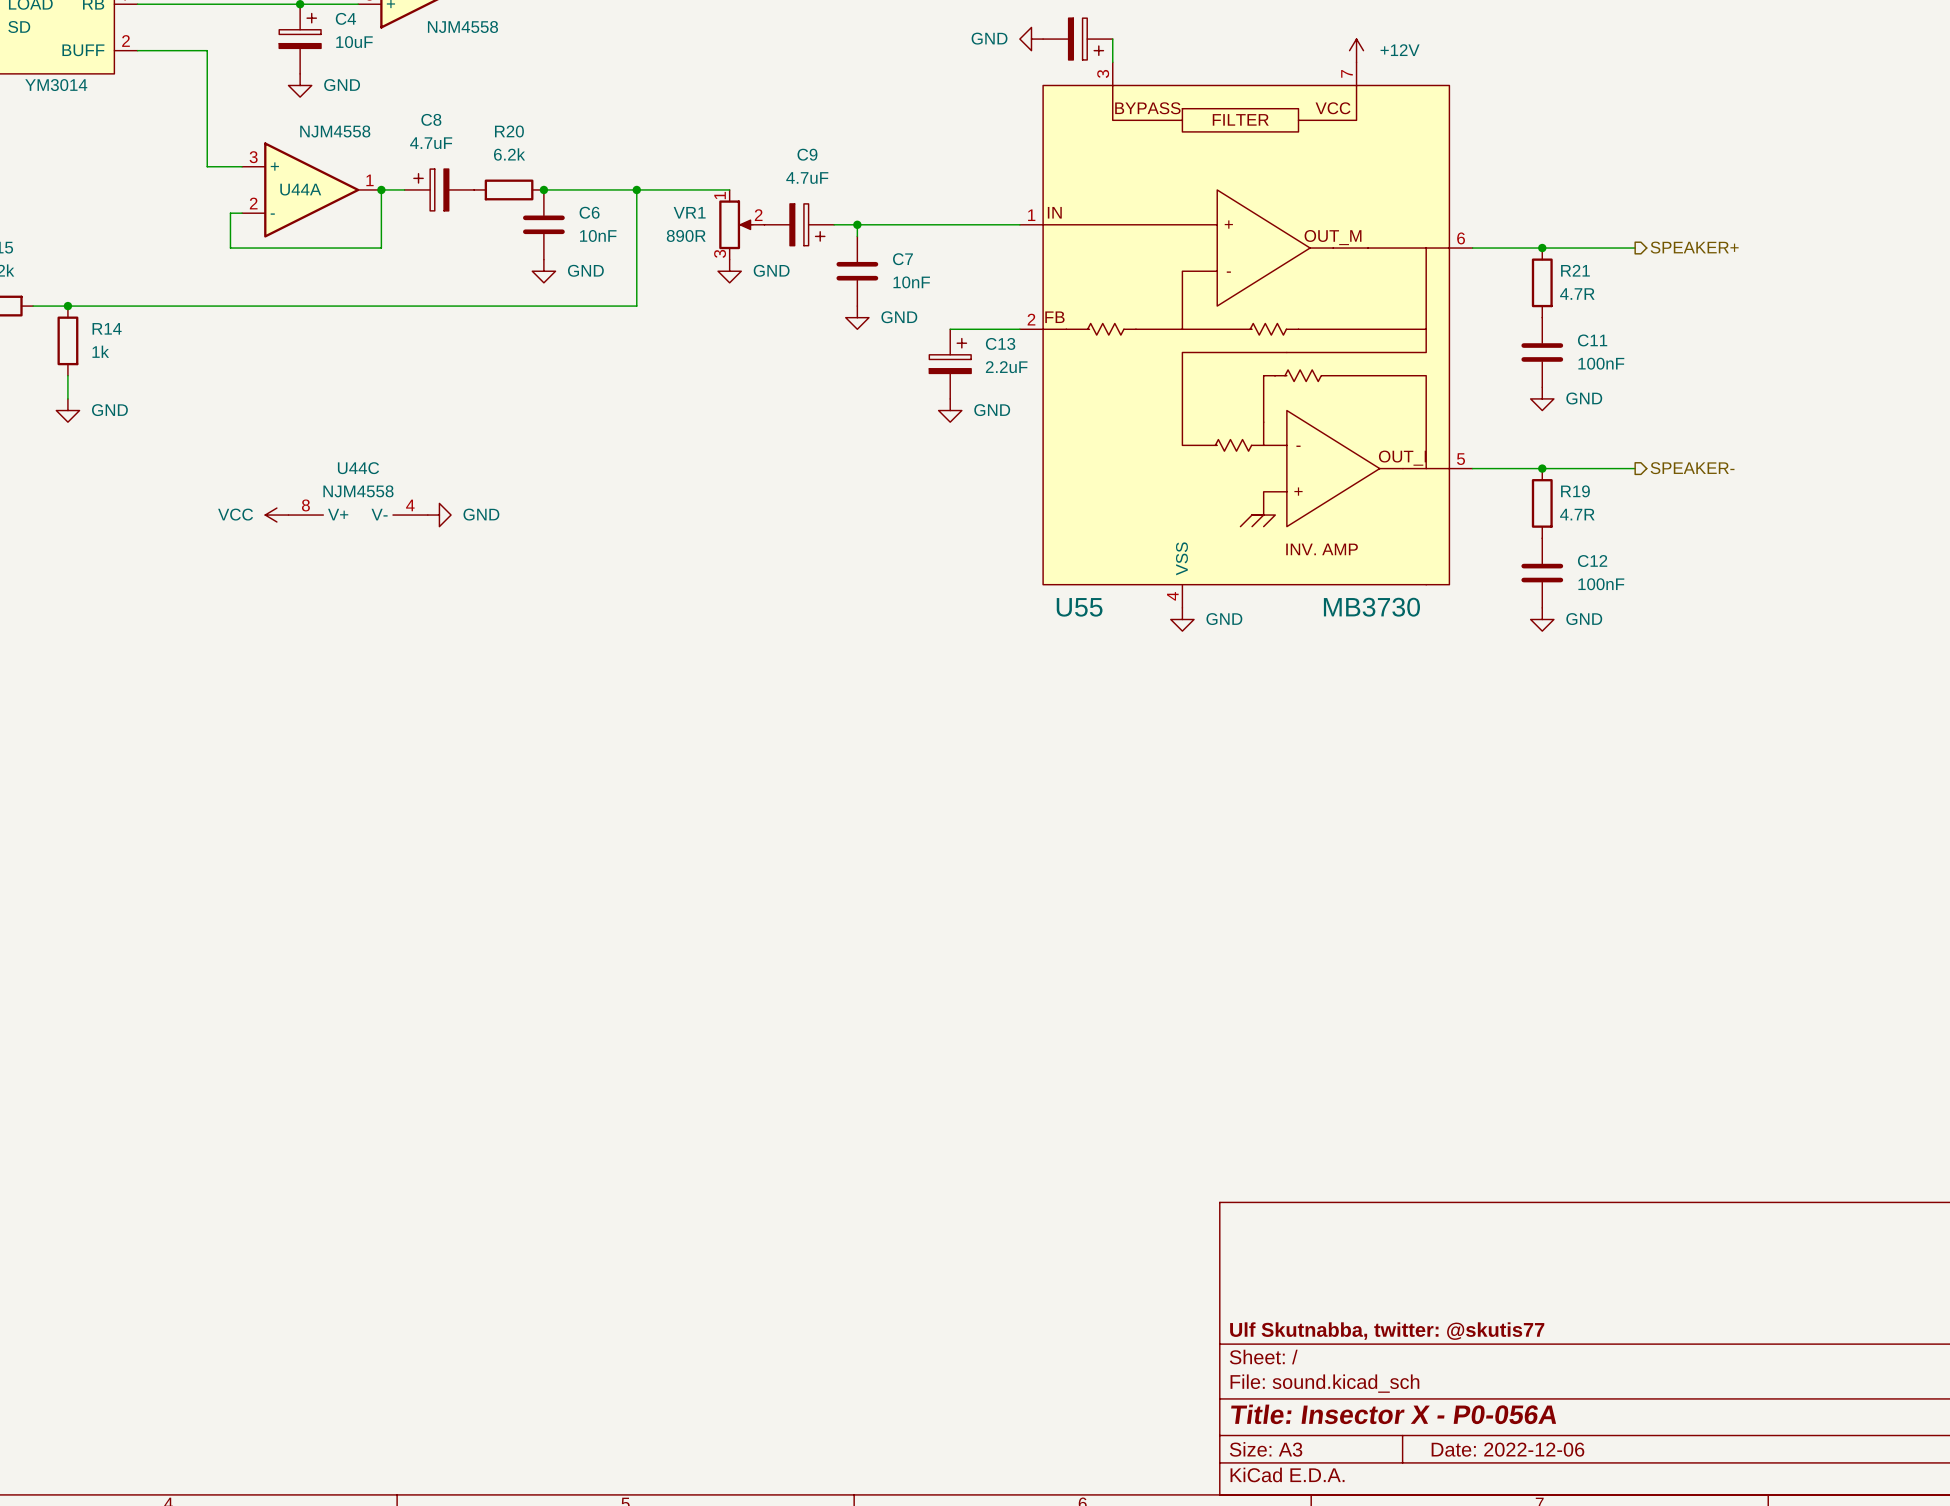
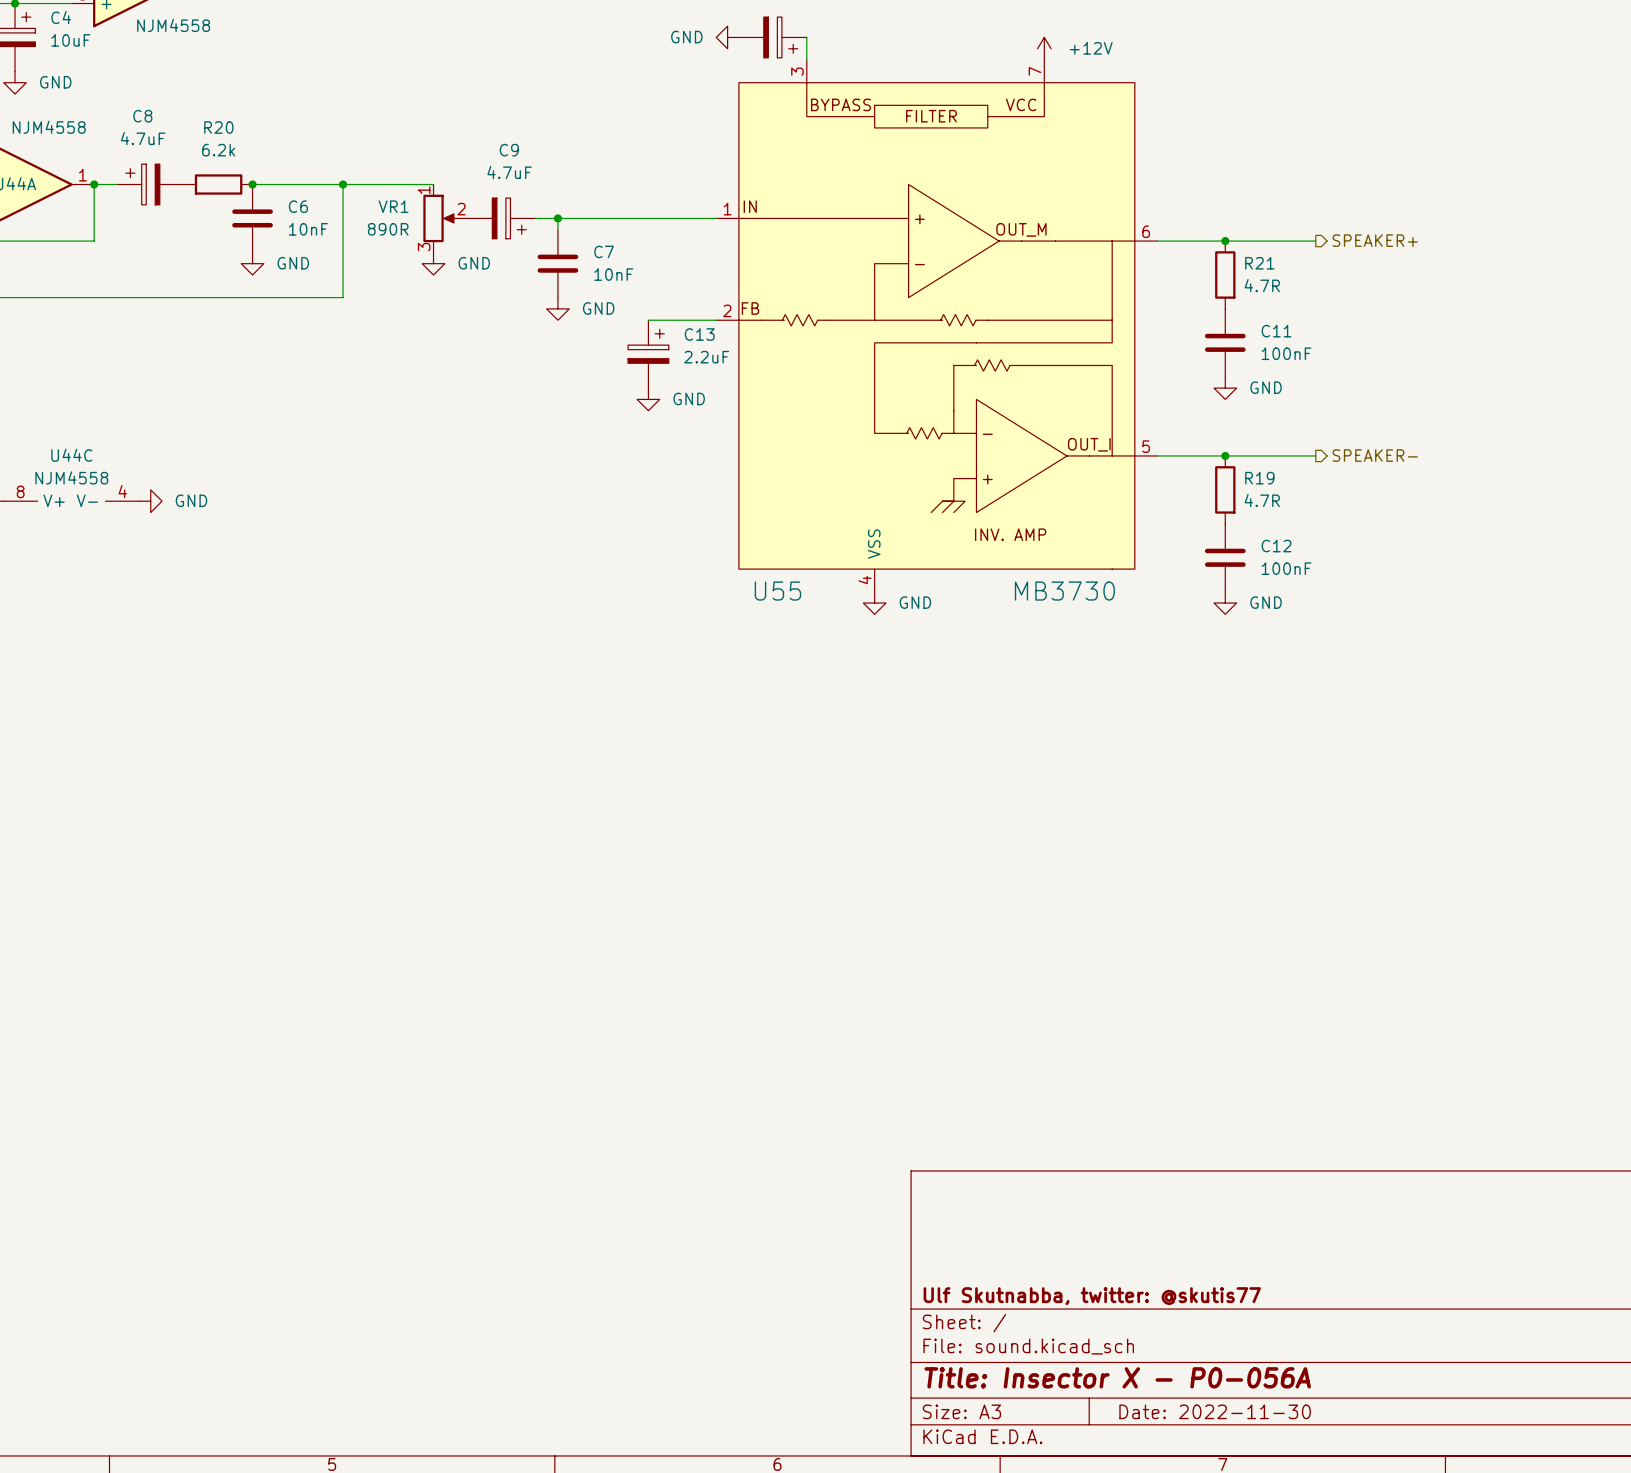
title block: Date: 2022-12-06 (1507, 1449) -> Date: 2022-11-30 (1215, 1411)

